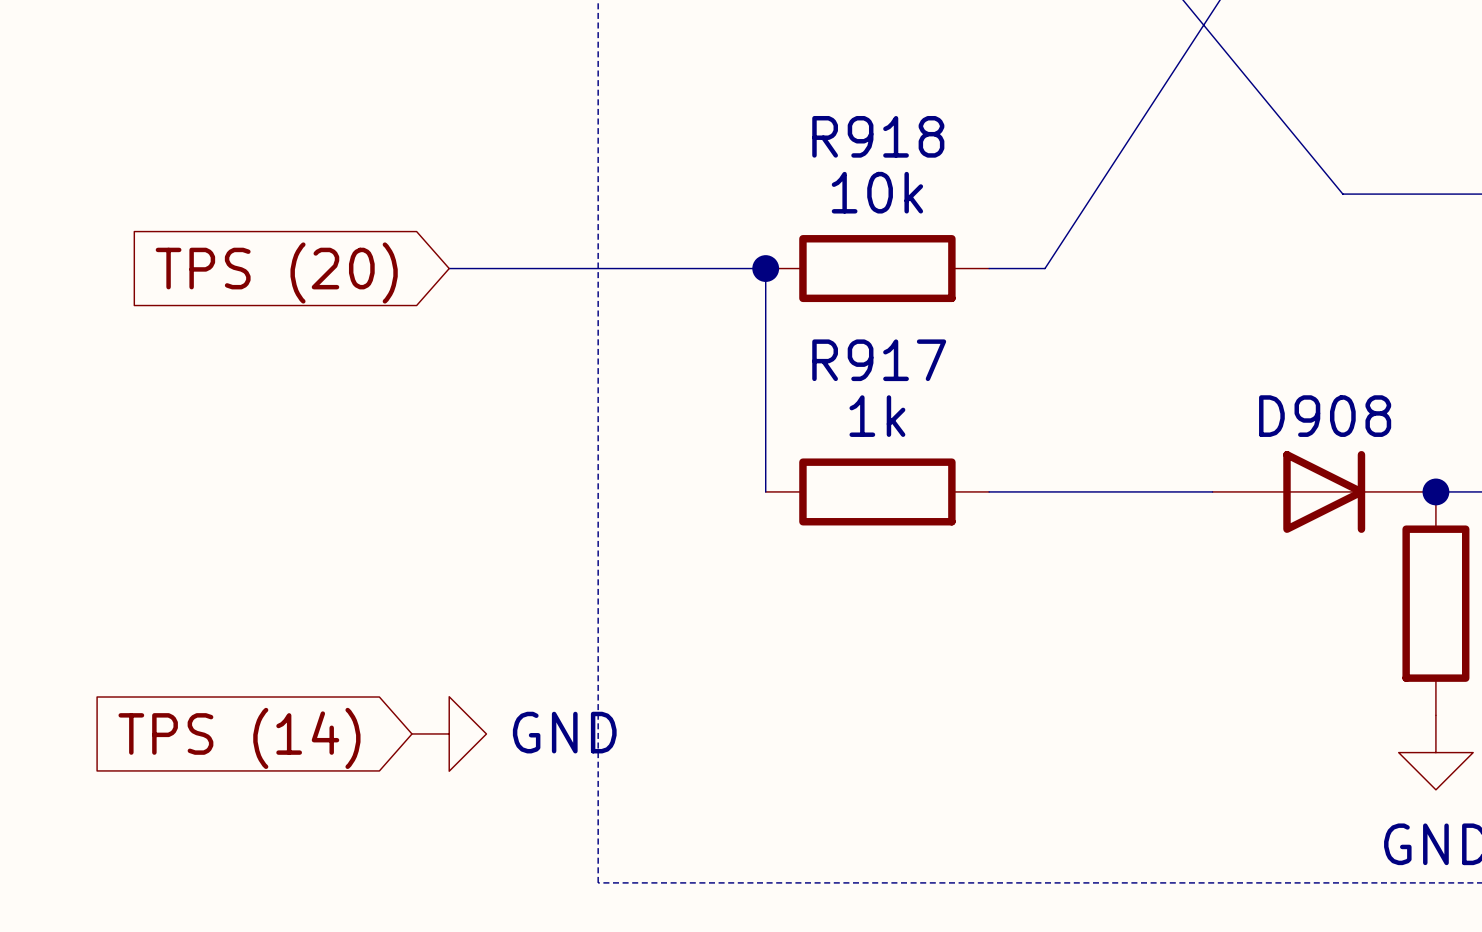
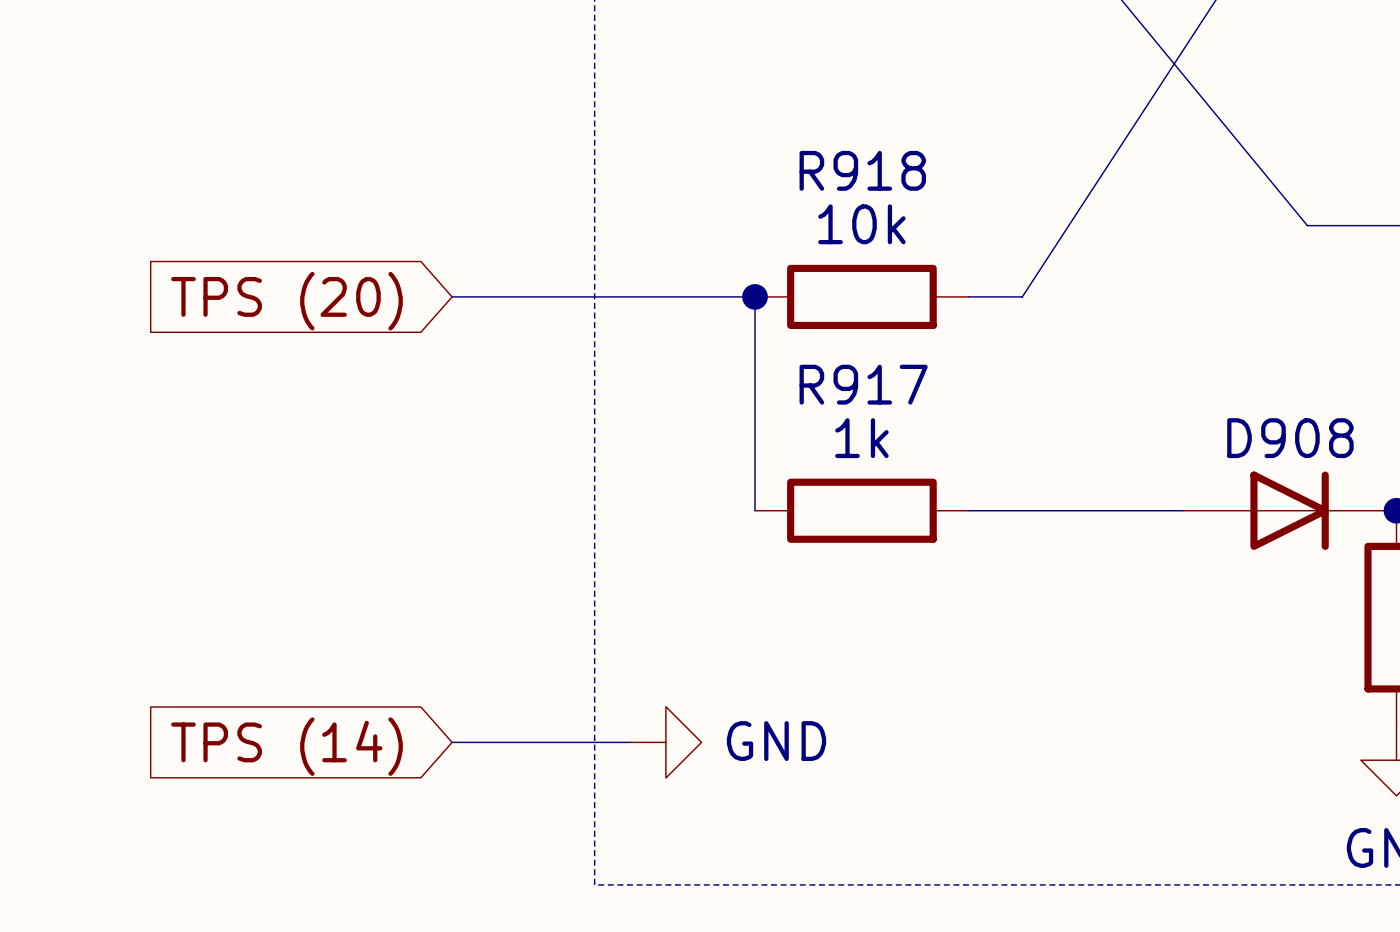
wire: none -> (452, 742) (630, 742)
power symbol position: GND (449, 733) -> GND (665, 742)
global label position: TPS (14) (239, 738) -> TPS (14) (286, 746)

